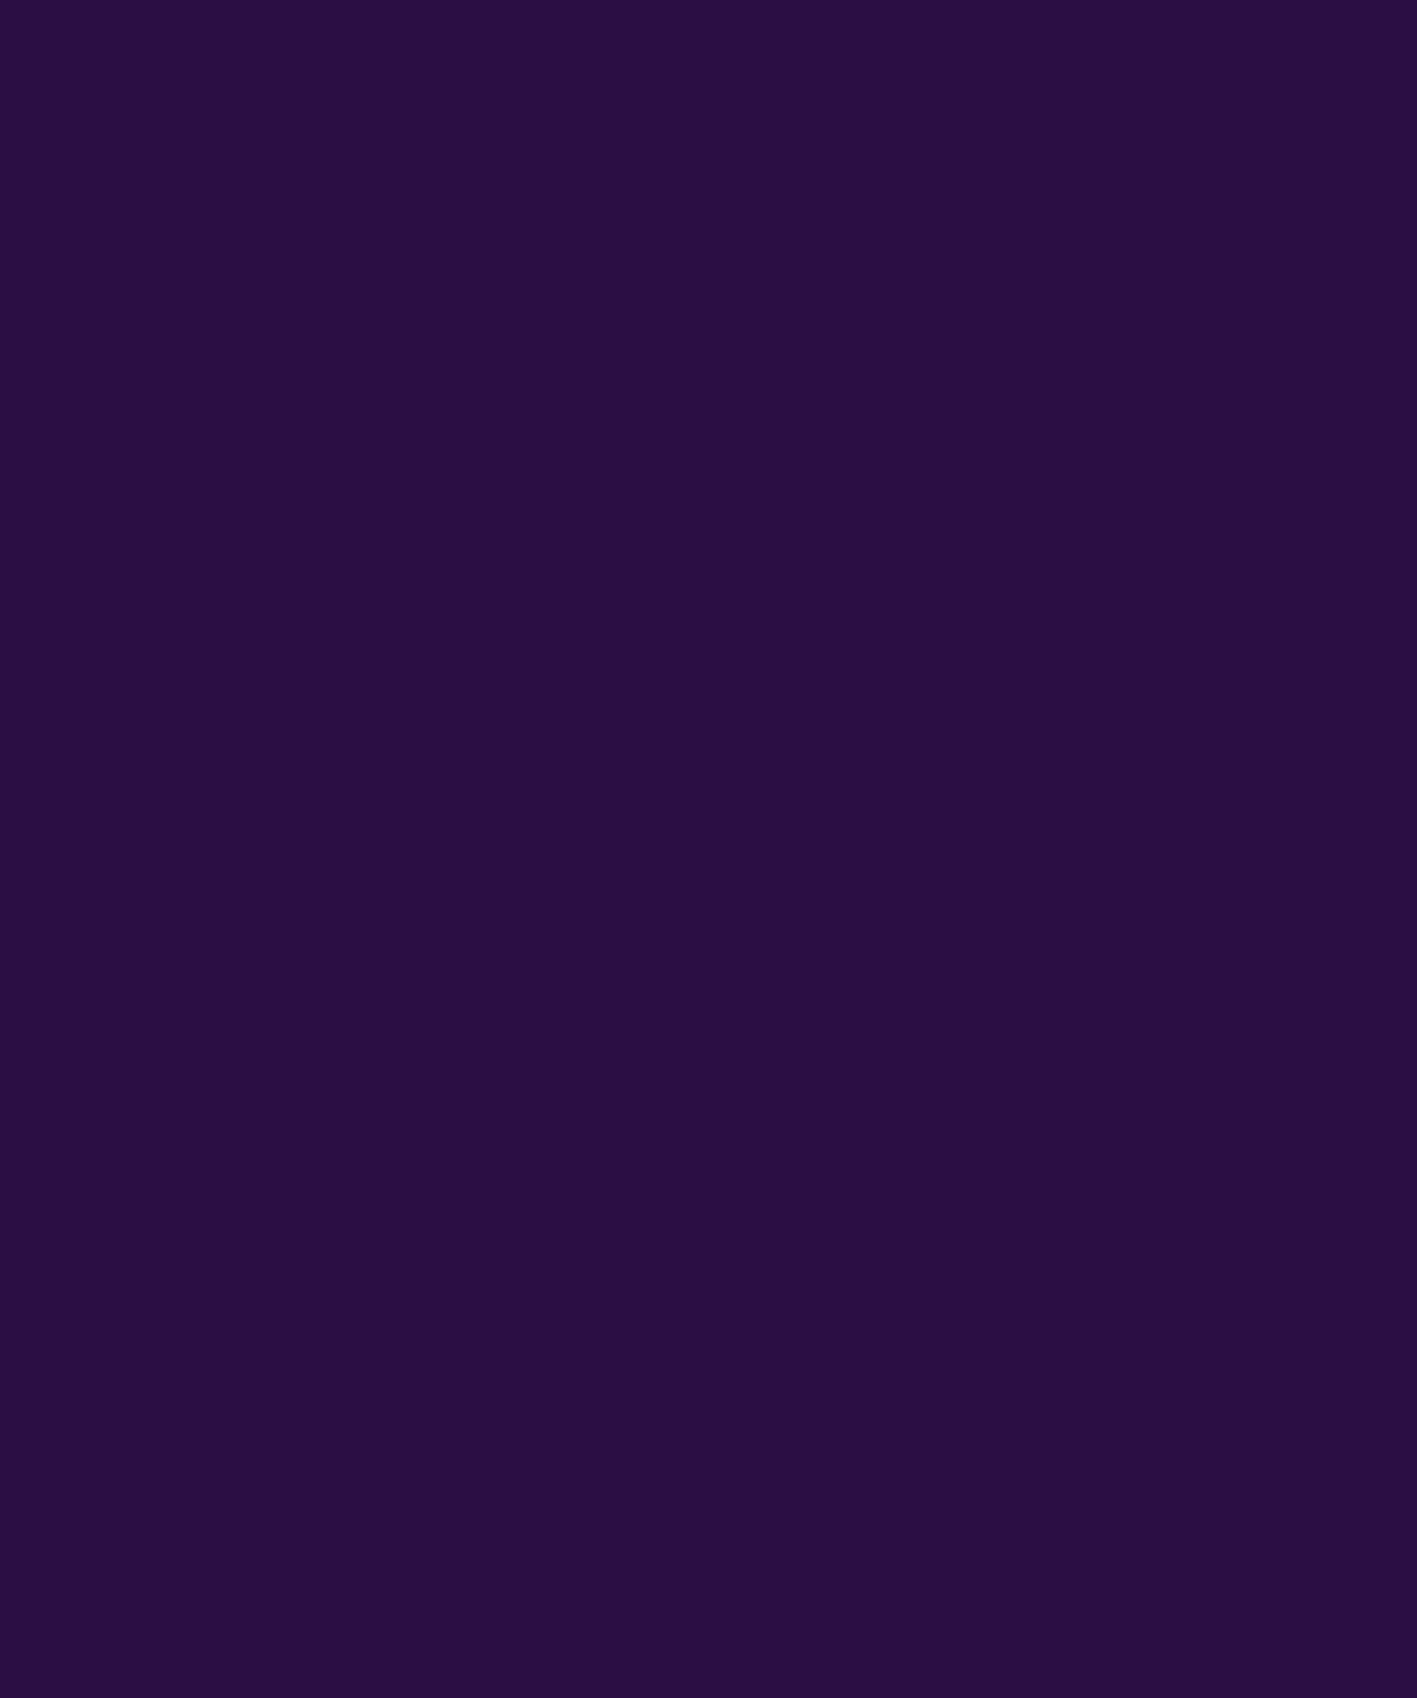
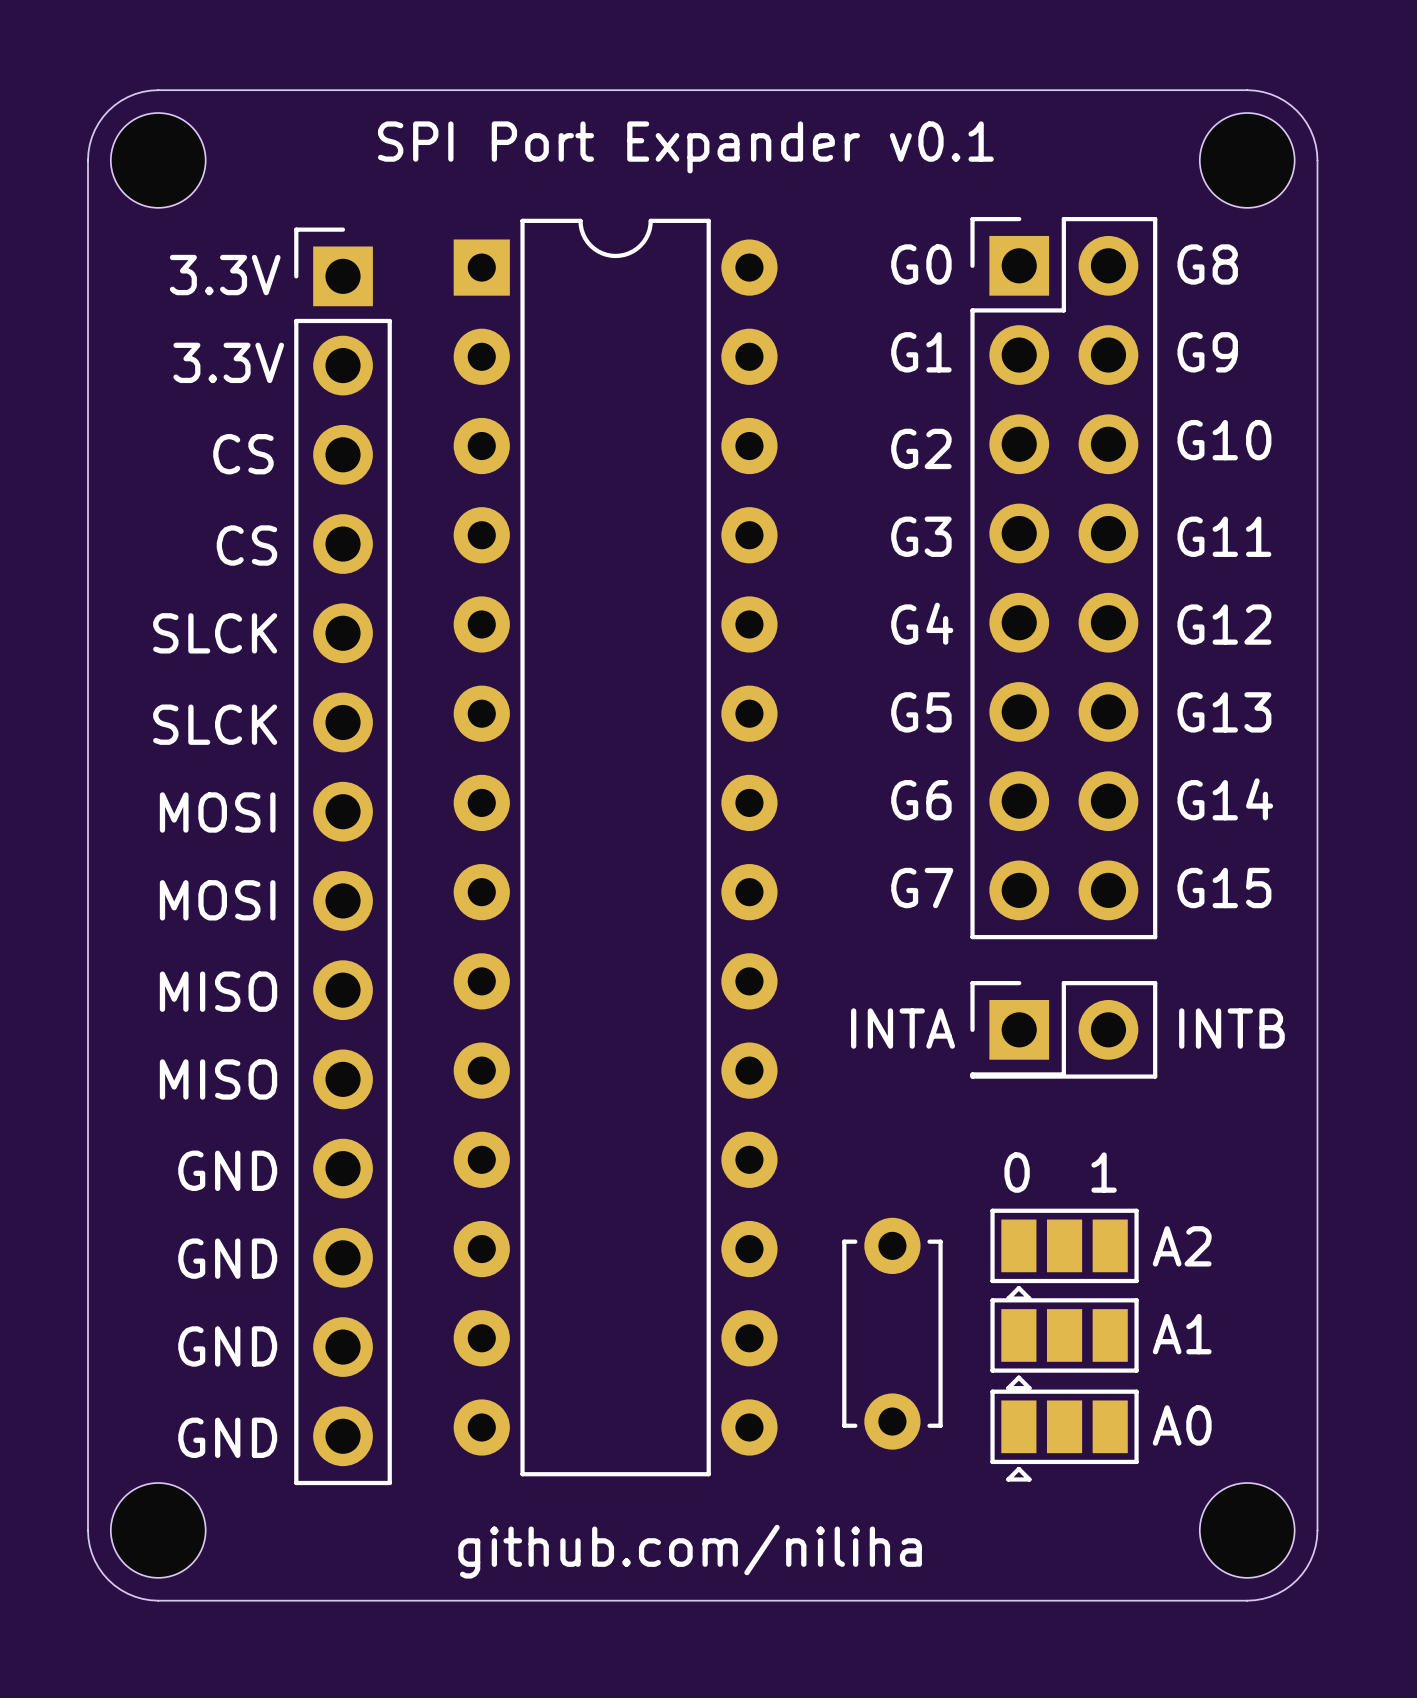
board edge: none -> (158, 90) (1247, 90) (1262, 91) (1277, 97) (1291, 105) (1302, 116) (1313, 137) (1317, 160) (1317, 1530) (1315, 1546) (1310, 1560) (1302, 1574) (1291, 1585) (1270, 1596) (1247, 1600) (158, 1600) (142, 1598) (127, 1593) (114, 1585) (103, 1574) (91, 1553) (87, 1530) (87, 160) (89, 144) (94, 129) (108, 110) (127, 97) (142, 91) (158, 90)
text: none -> SPI Port Expander v0.1 (685, 147)
part: none -> (158, 160)
part: none -> (1247, 160)
text: none -> G0 (921, 264)
text: none -> G8 (1207, 264)
text: none -> 3.3V (225, 275)
text: none -> G1 (921, 352)
text: none -> G9 (1207, 352)
text: none -> 3.3V (228, 362)
text: none -> G10 (1224, 440)
text: none -> G2 (921, 448)
text: none -> CS (243, 454)
text: none -> G3 (921, 536)
text: none -> G11 (1224, 536)
text: none -> CS (246, 545)
part: none -> (1063, 578)
text: none -> G4 (922, 623)
text: none -> G12 (1224, 624)
text: none -> SLCK (215, 633)
text: none -> G5 (921, 712)
text: none -> G13 (1224, 712)
text: none -> SLCK (215, 724)
text: none -> G14 (1225, 799)
text: none -> G6 (921, 800)
text: none -> MOSI (217, 812)
part: none -> (615, 847)
part: none -> (343, 856)
text: none -> G7 (922, 888)
text: none -> G15 (1224, 888)
text: none -> MOSI (217, 900)
text: none -> MISO (218, 991)
text: none -> INTA (903, 1028)
text: none -> INTB (1231, 1028)
part: none -> (1063, 1029)
text: none -> MISO (218, 1079)
text: none -> GND (227, 1170)
text: none -> 0 1 (1060, 1172)
text: none -> A2 (1182, 1246)
part: none -> (1064, 1254)
text: none -> GND (227, 1258)
part: none -> (892, 1333)
text: none -> A1 (1182, 1334)
part: none -> (1064, 1344)
text: none -> GND (227, 1346)
text: none -> A0 (1182, 1425)
part: none -> (1064, 1435)
text: none -> GND (227, 1437)
part: none -> (158, 1530)
part: none -> (1247, 1530)
text: none -> github.com/niliha (690, 1551)

